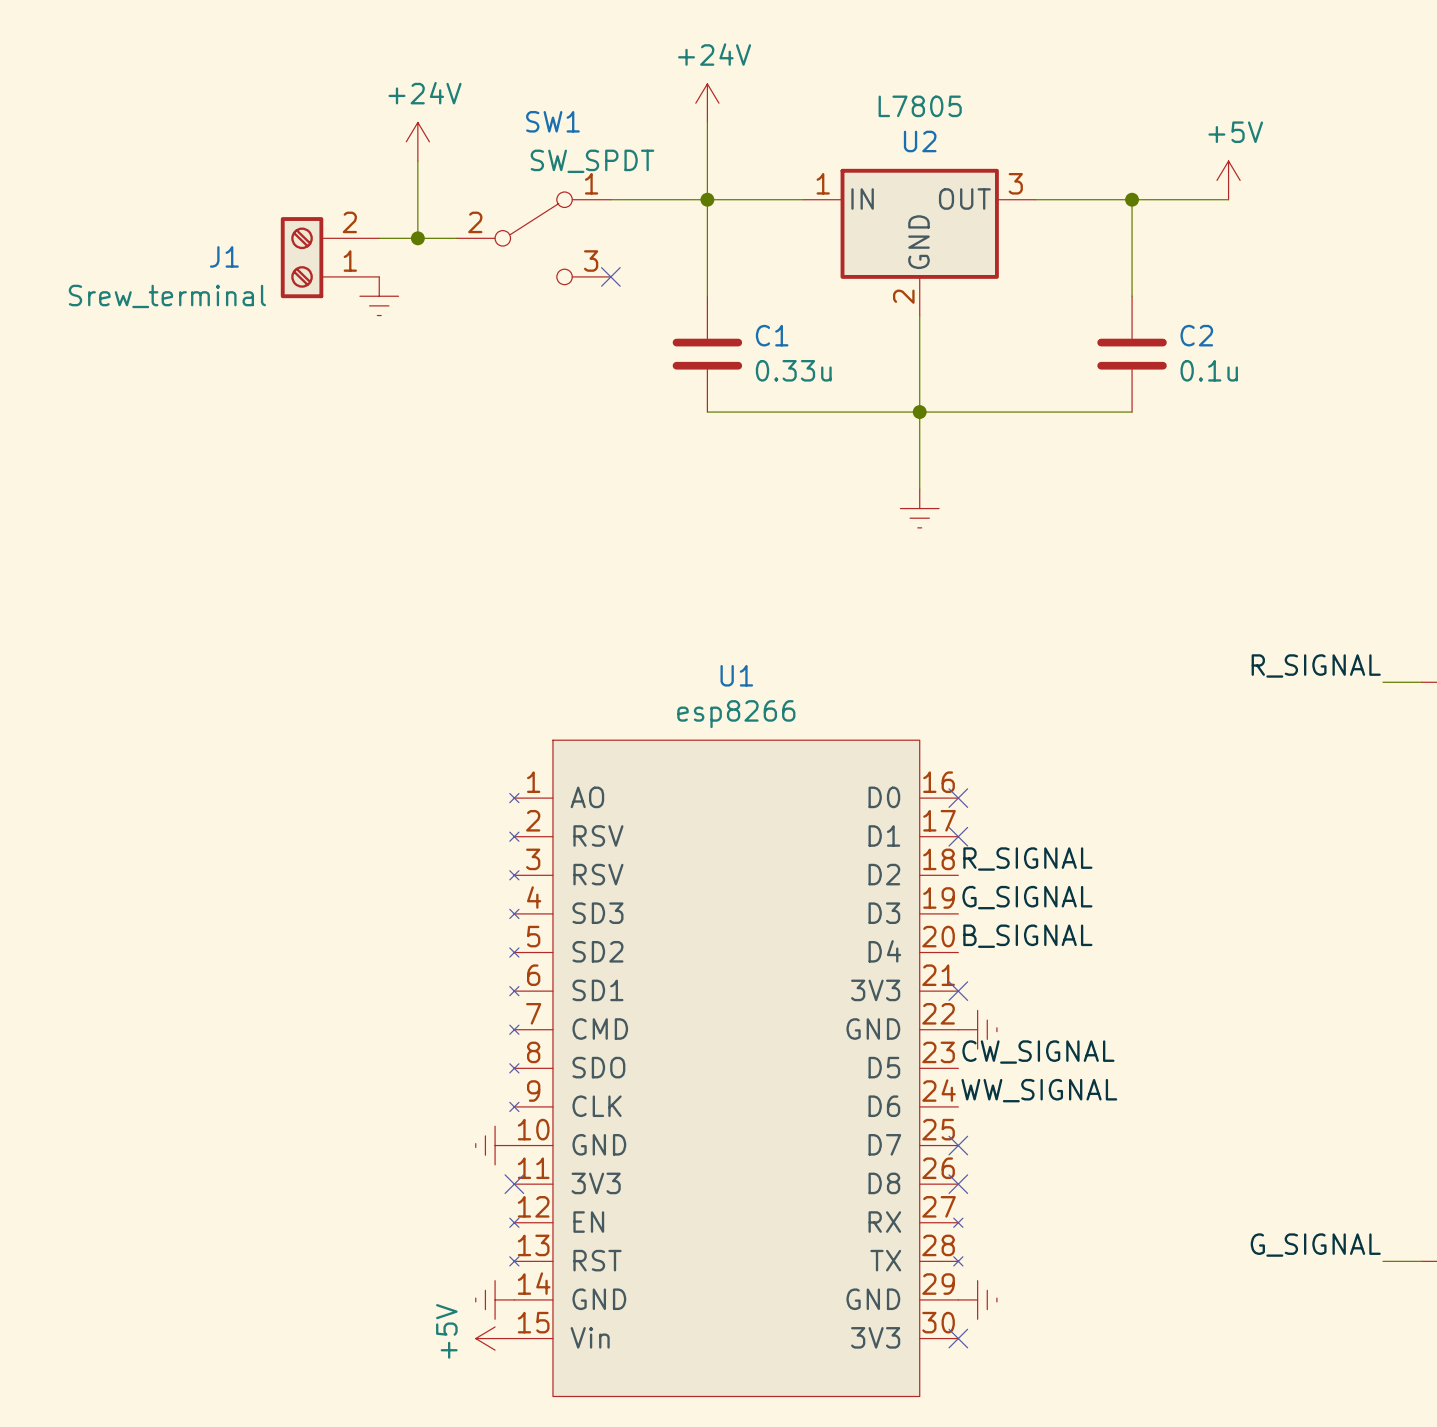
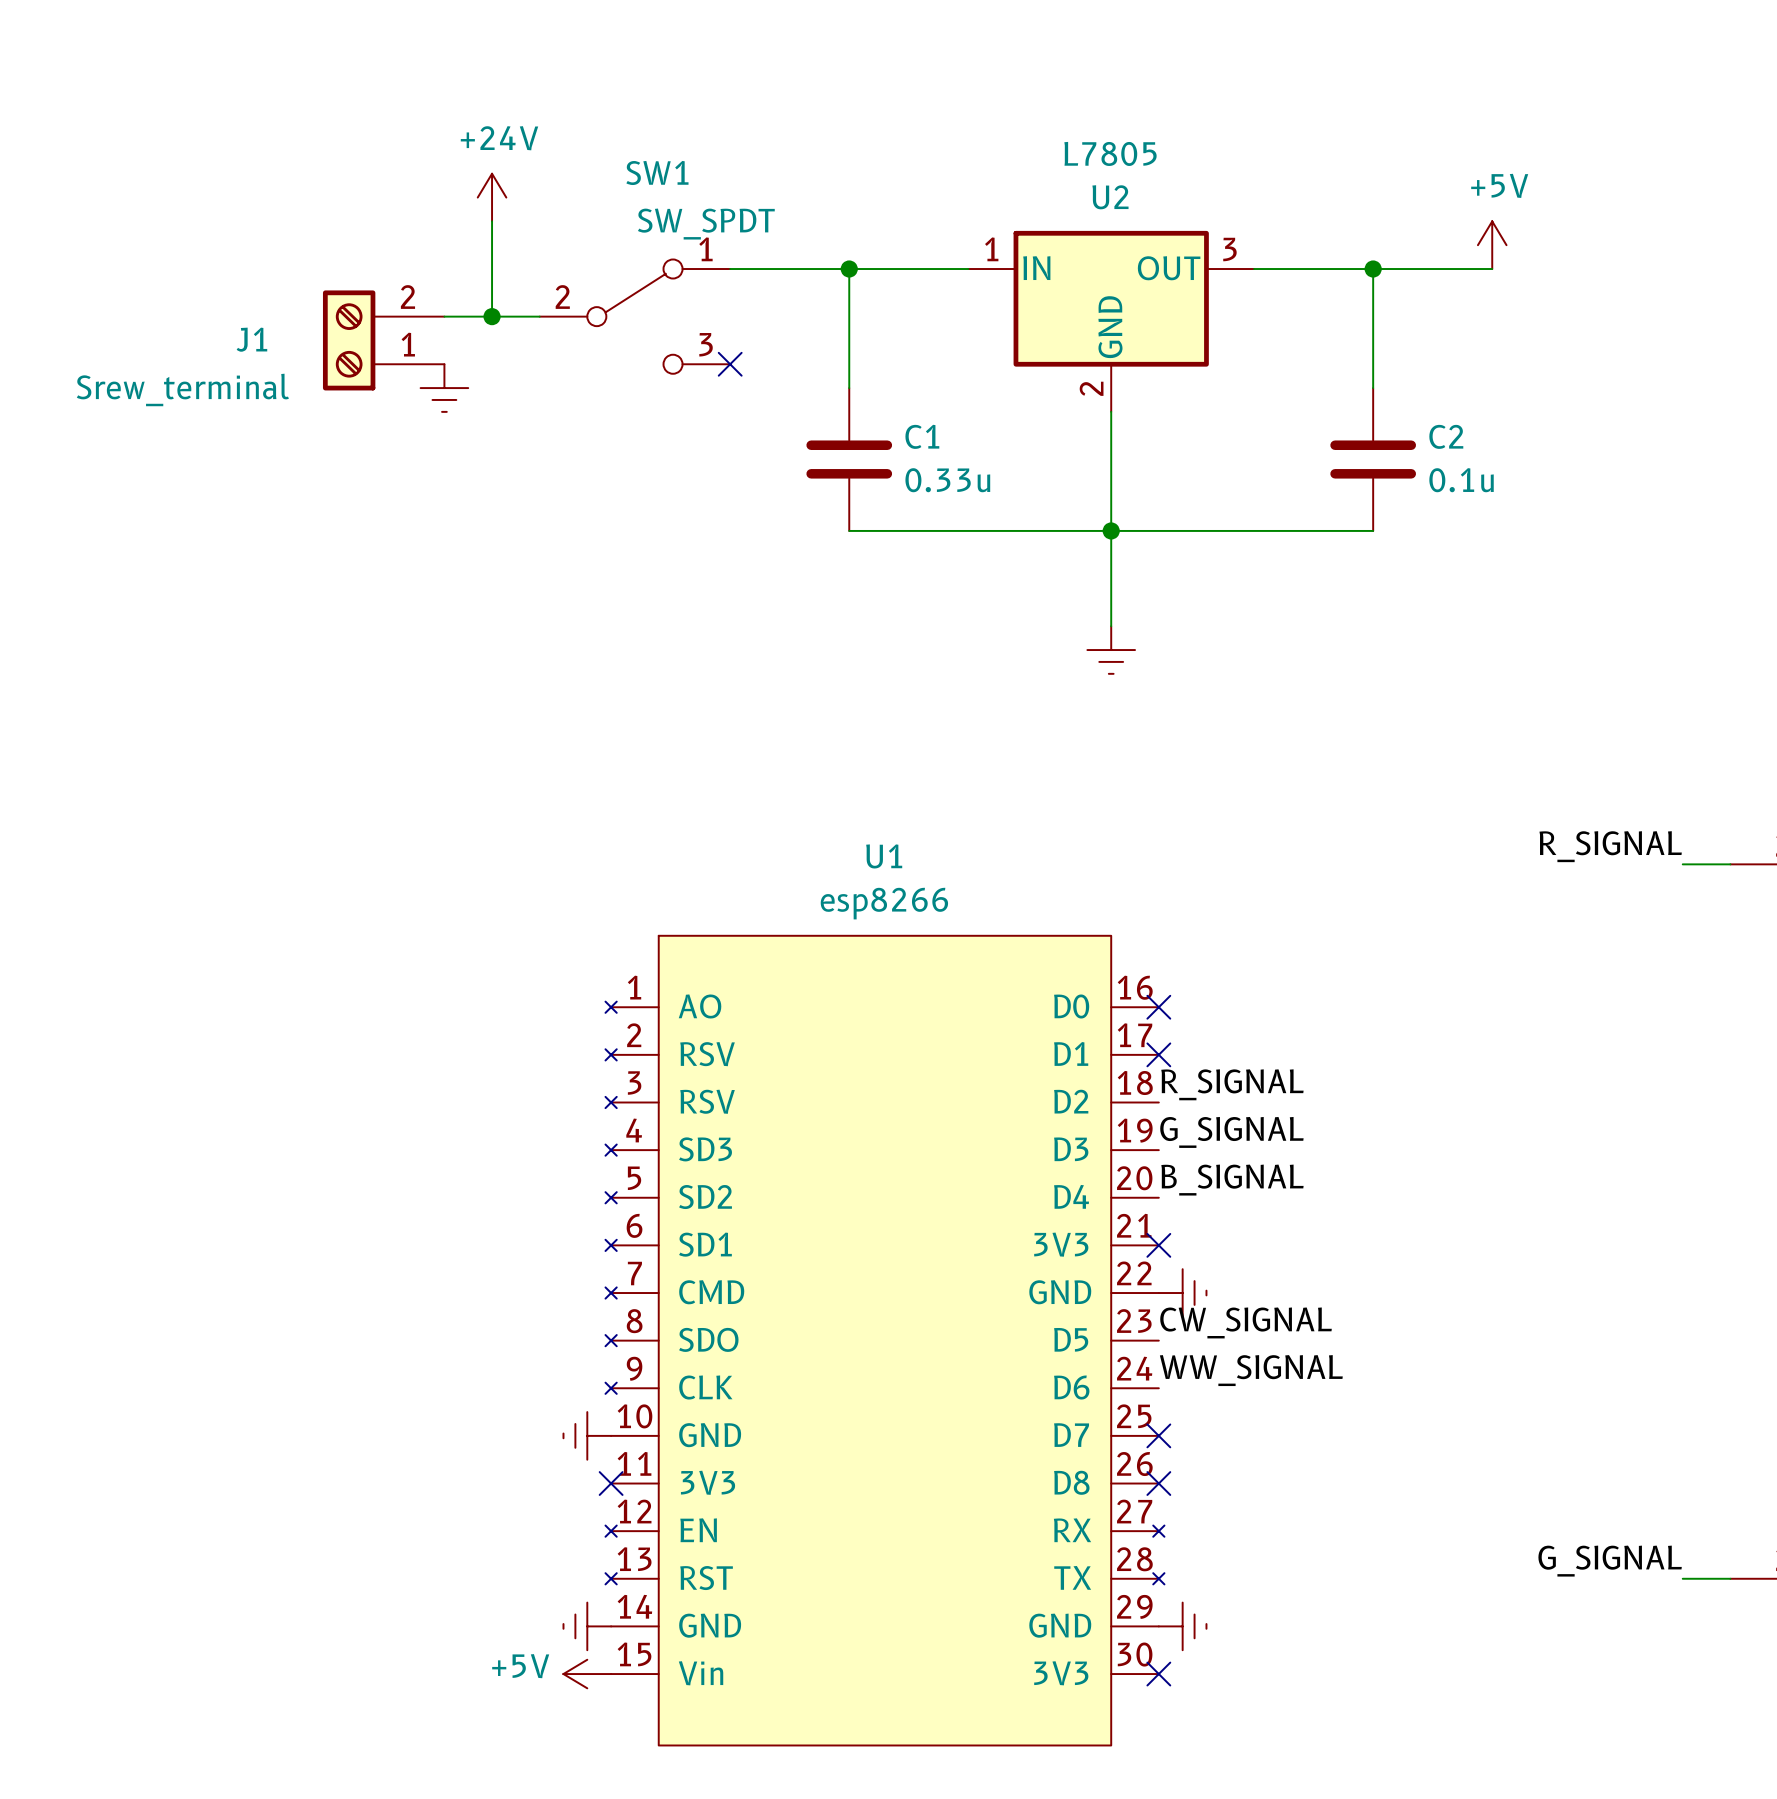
power symbol: +24V (707, 103) -> none
wire: (707, 122) (707, 199) -> none
power symbol text rotation: 0° (446, 1331) -> 90° clockwise (520, 1666)

